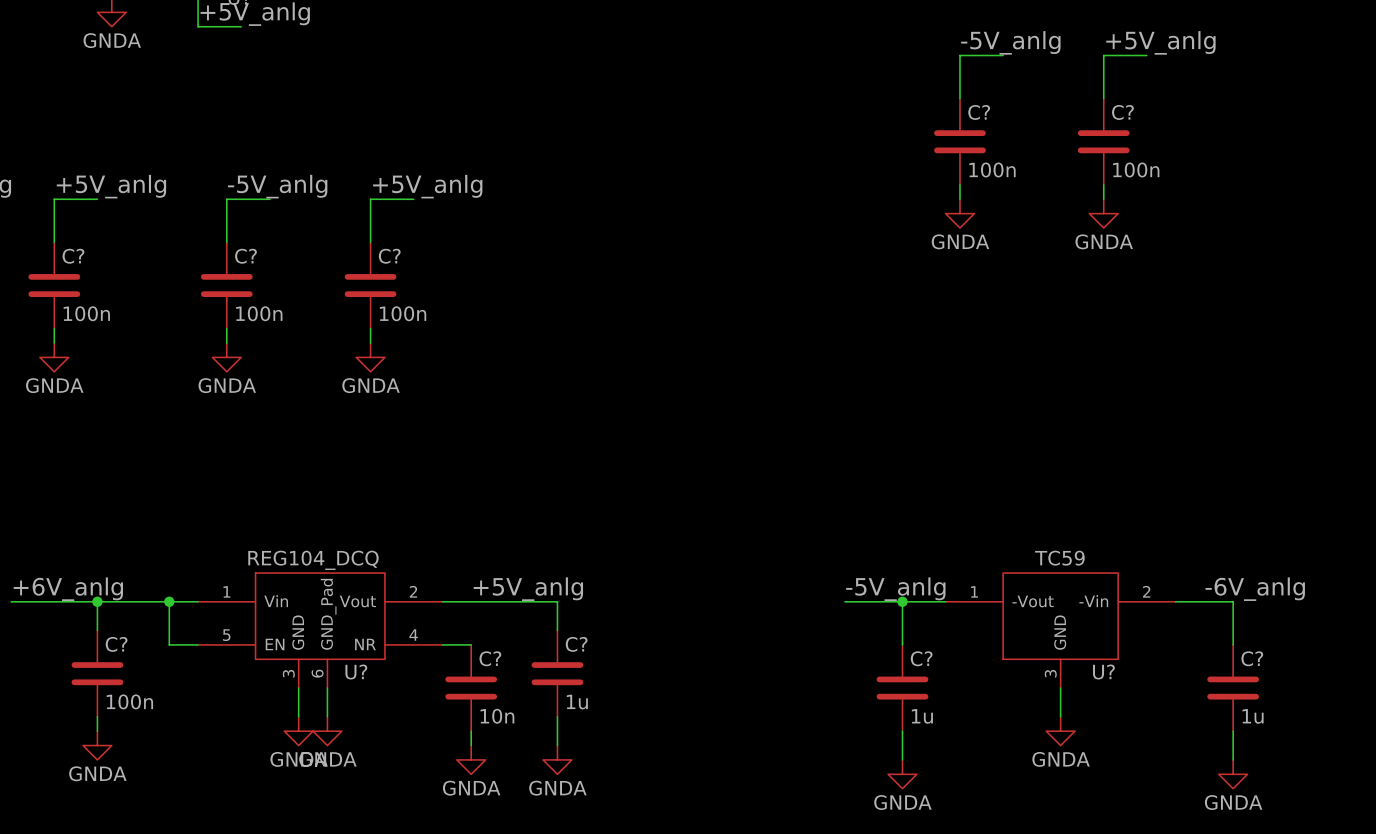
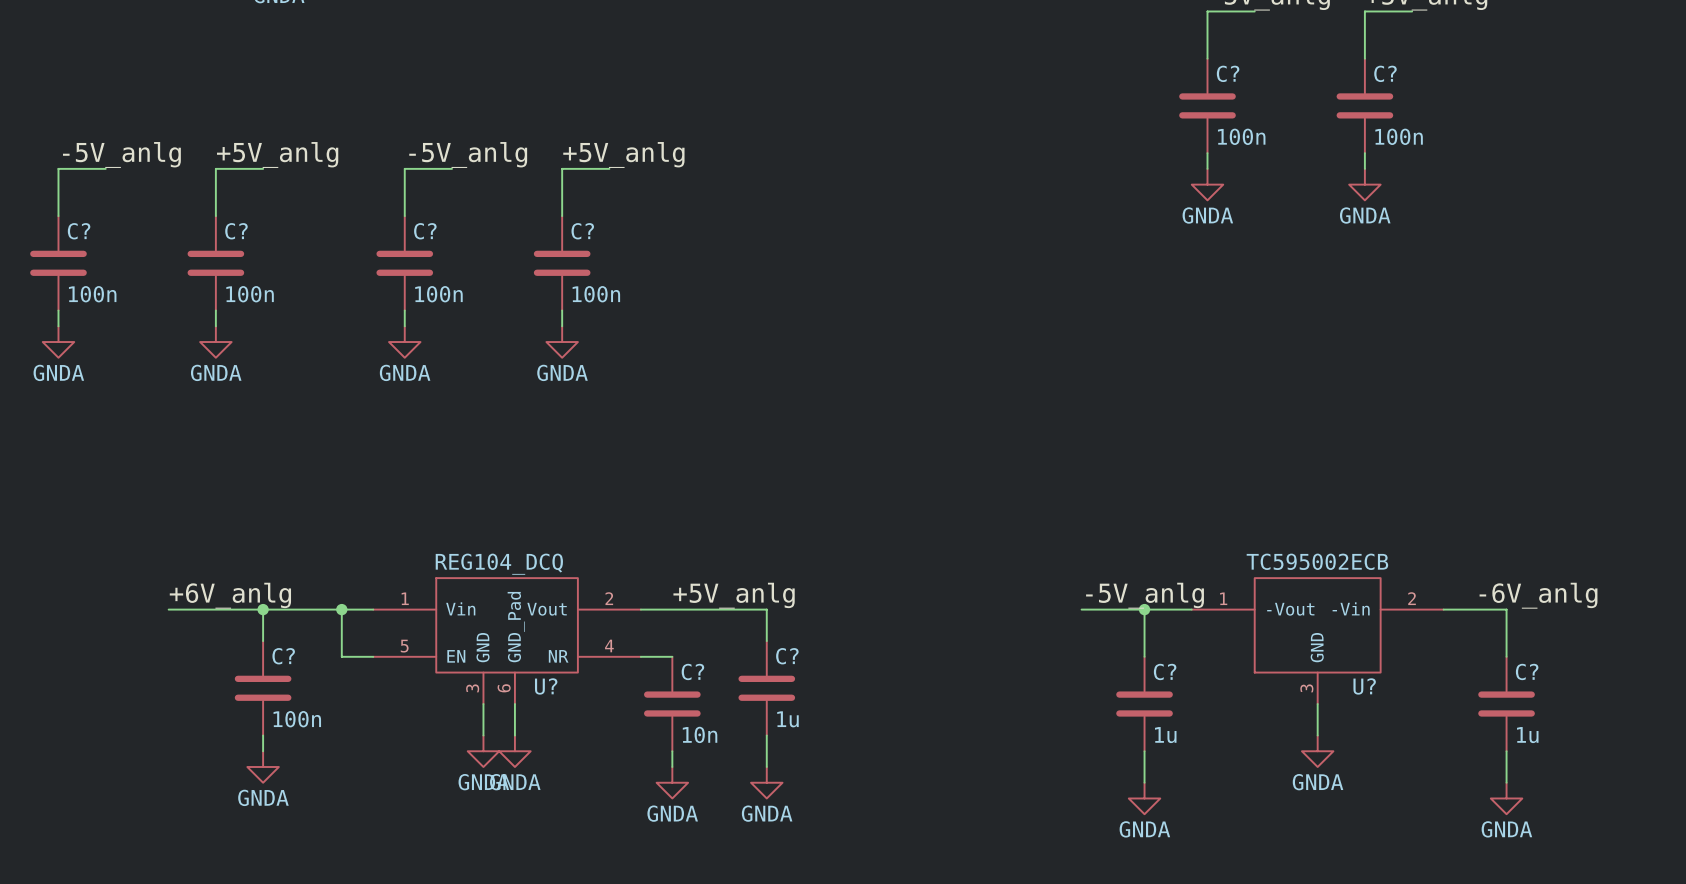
U? value: TC59 (1059, 558) -> TC595002ECB (1317, 561)

